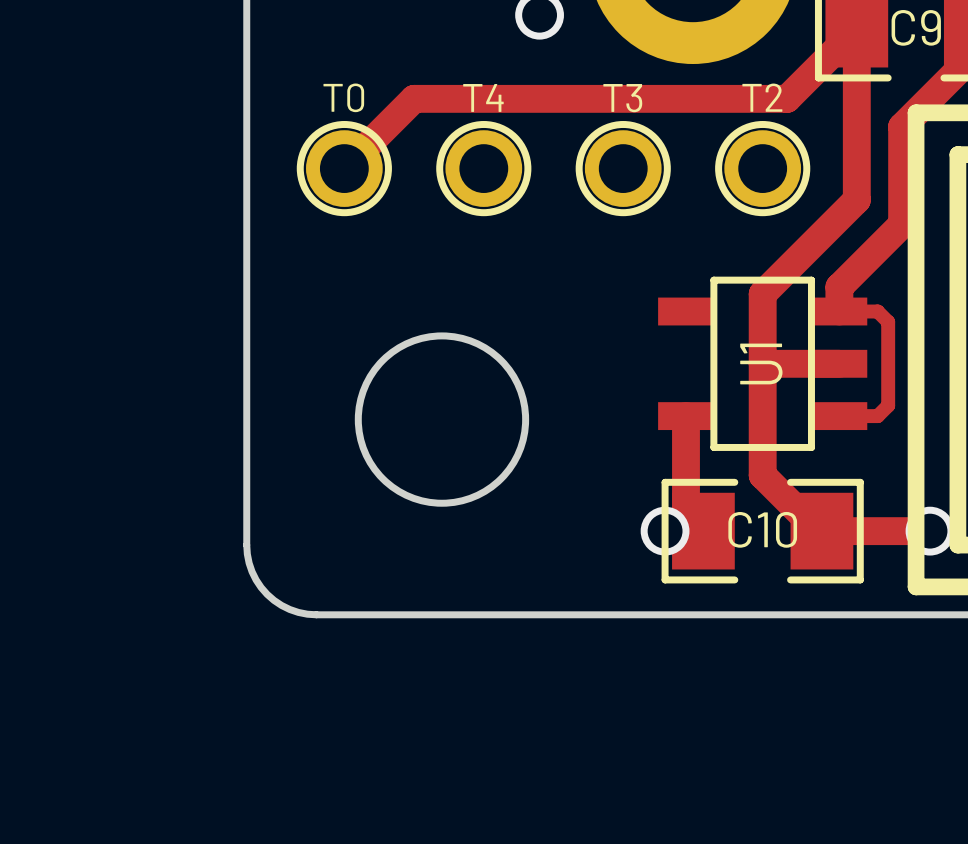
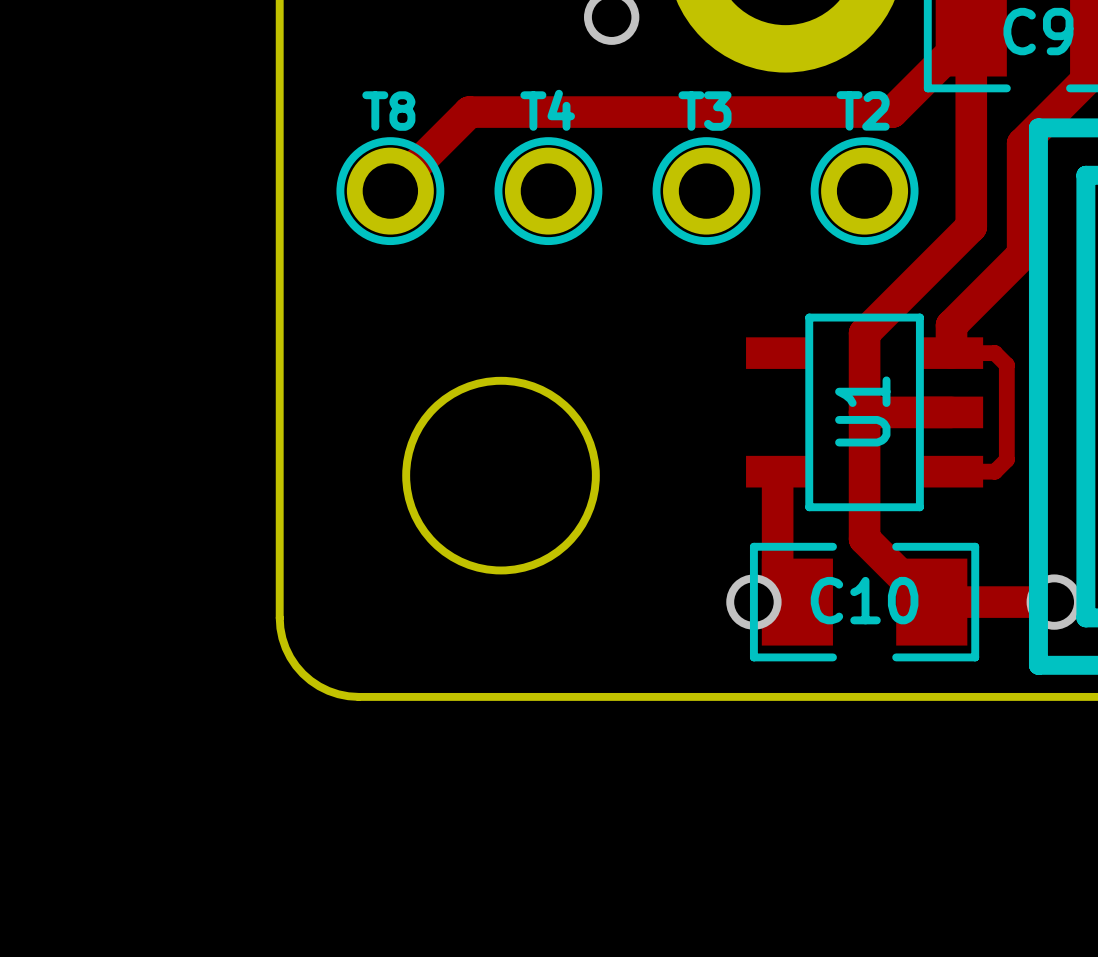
T0 name: T0 (343, 97) -> T8 (388, 111)

